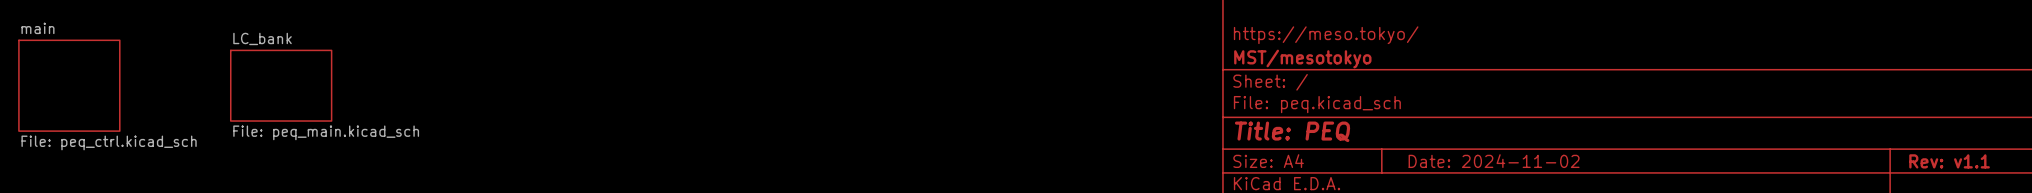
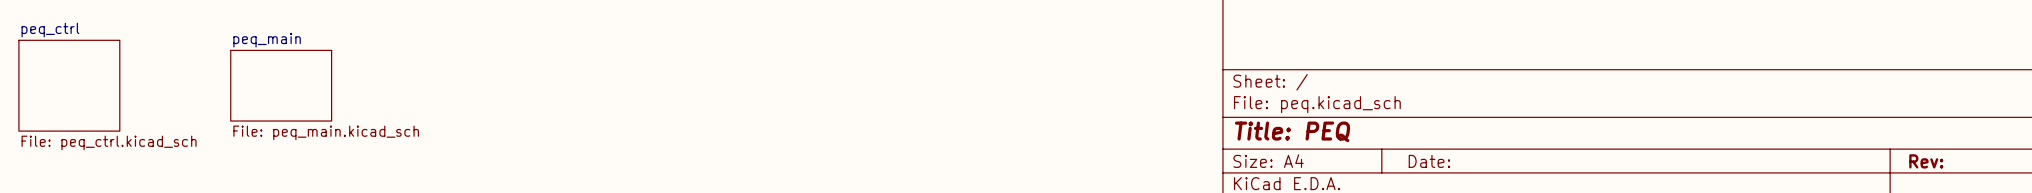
sheet main name: main (37, 28) -> peq_ctrl (50, 30)
title block: https://meso.tokyo/ (1326, 35) -> none
sheet LC_bank name: LC_bank (262, 38) -> peq_main (267, 40)
title block: MST/mesotokyo (1302, 59) -> none
title block: Date: 2024-11-02 (1494, 161) -> Date: (1429, 161)
title block: Rev: v1.1 (1949, 161) -> Rev: (1926, 161)

